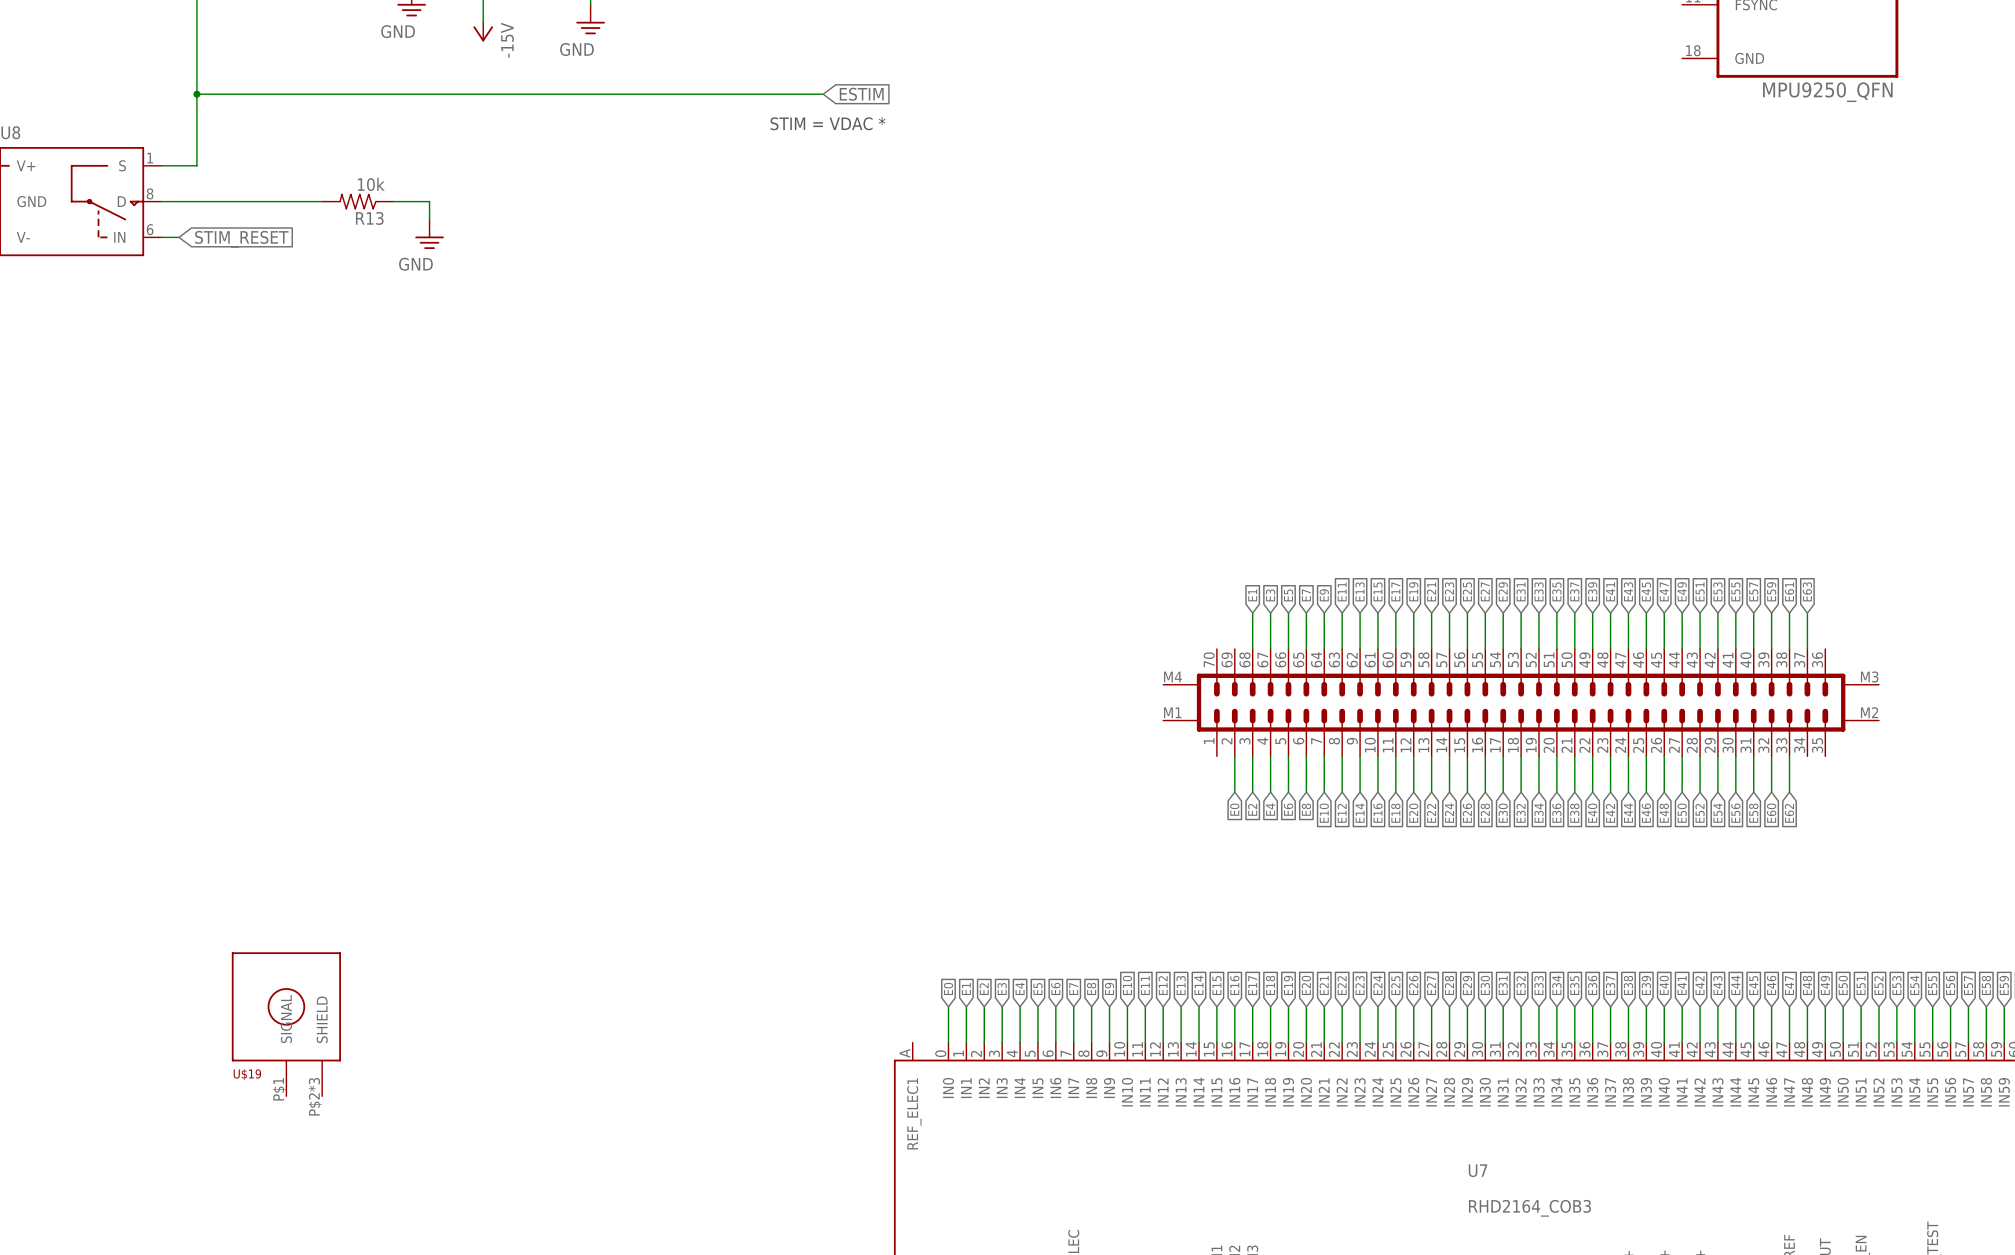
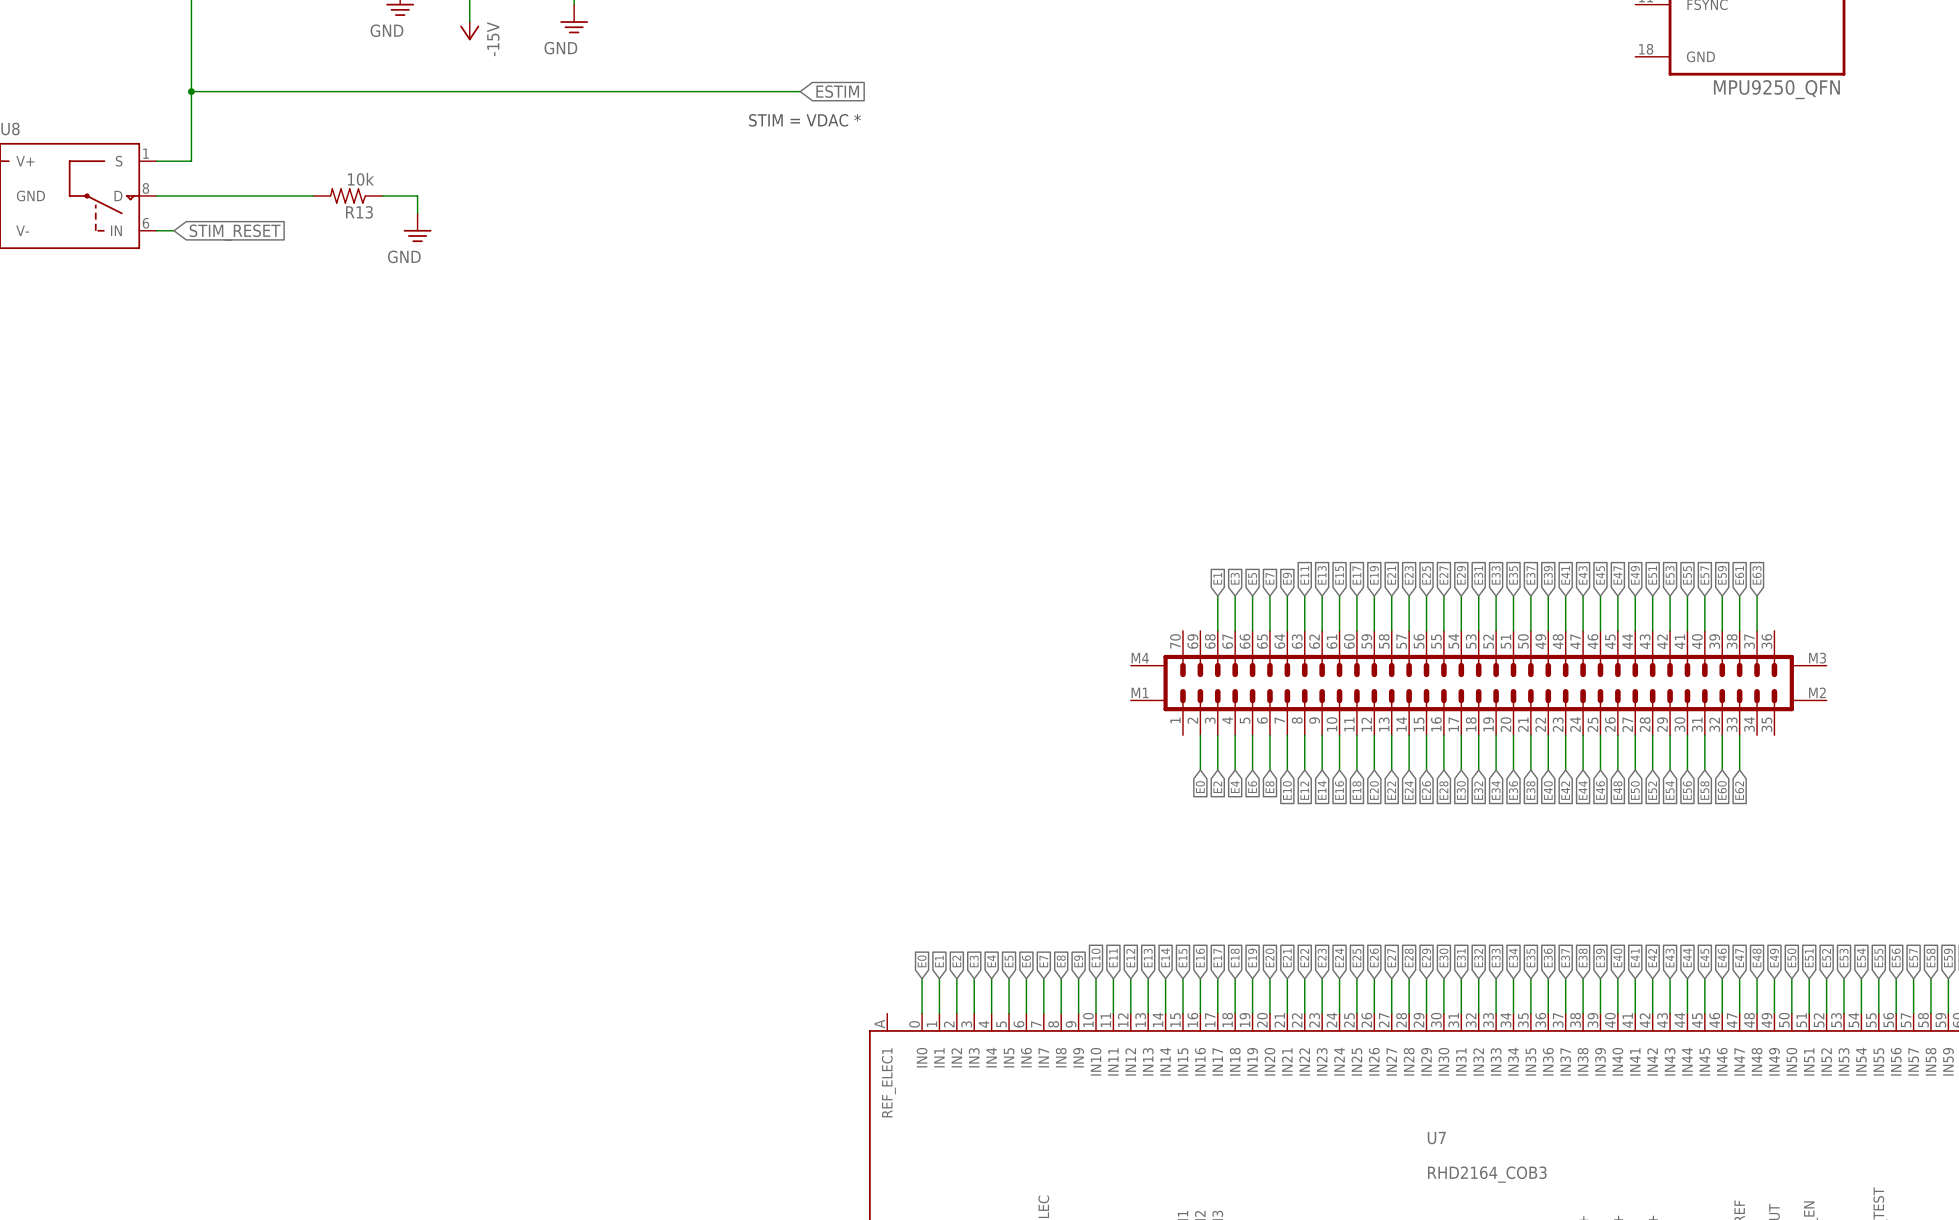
U$19: (286, 1024) -> none

